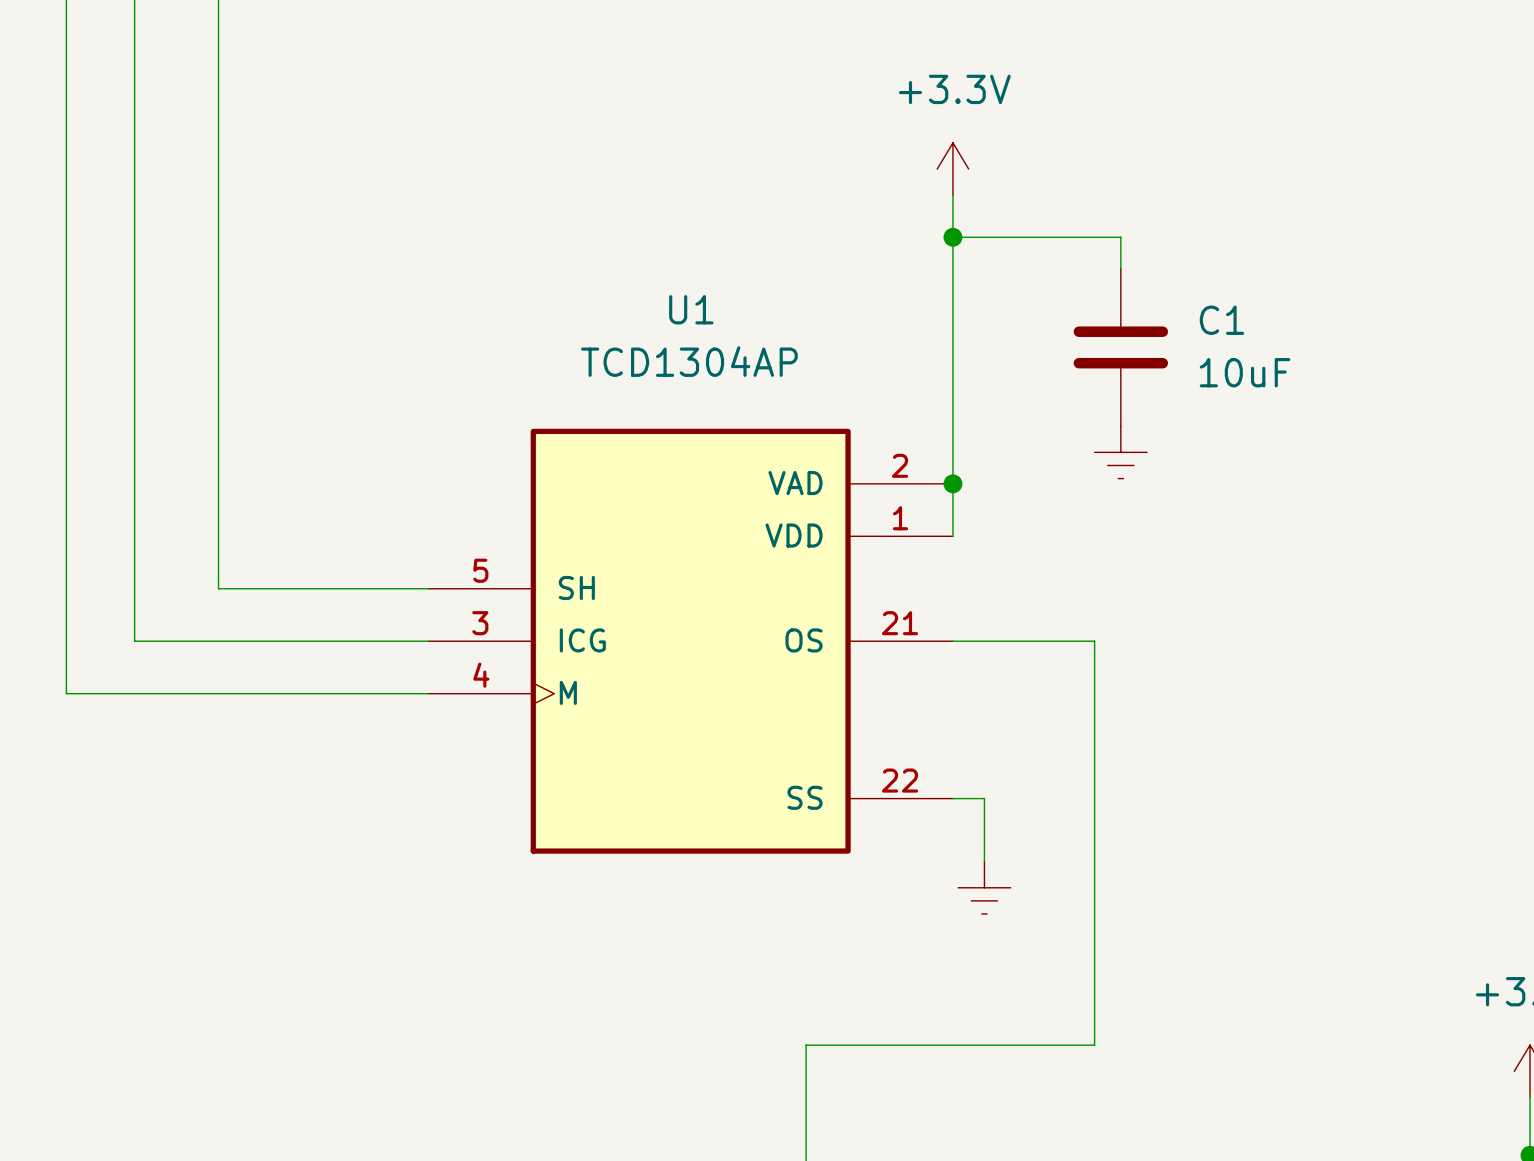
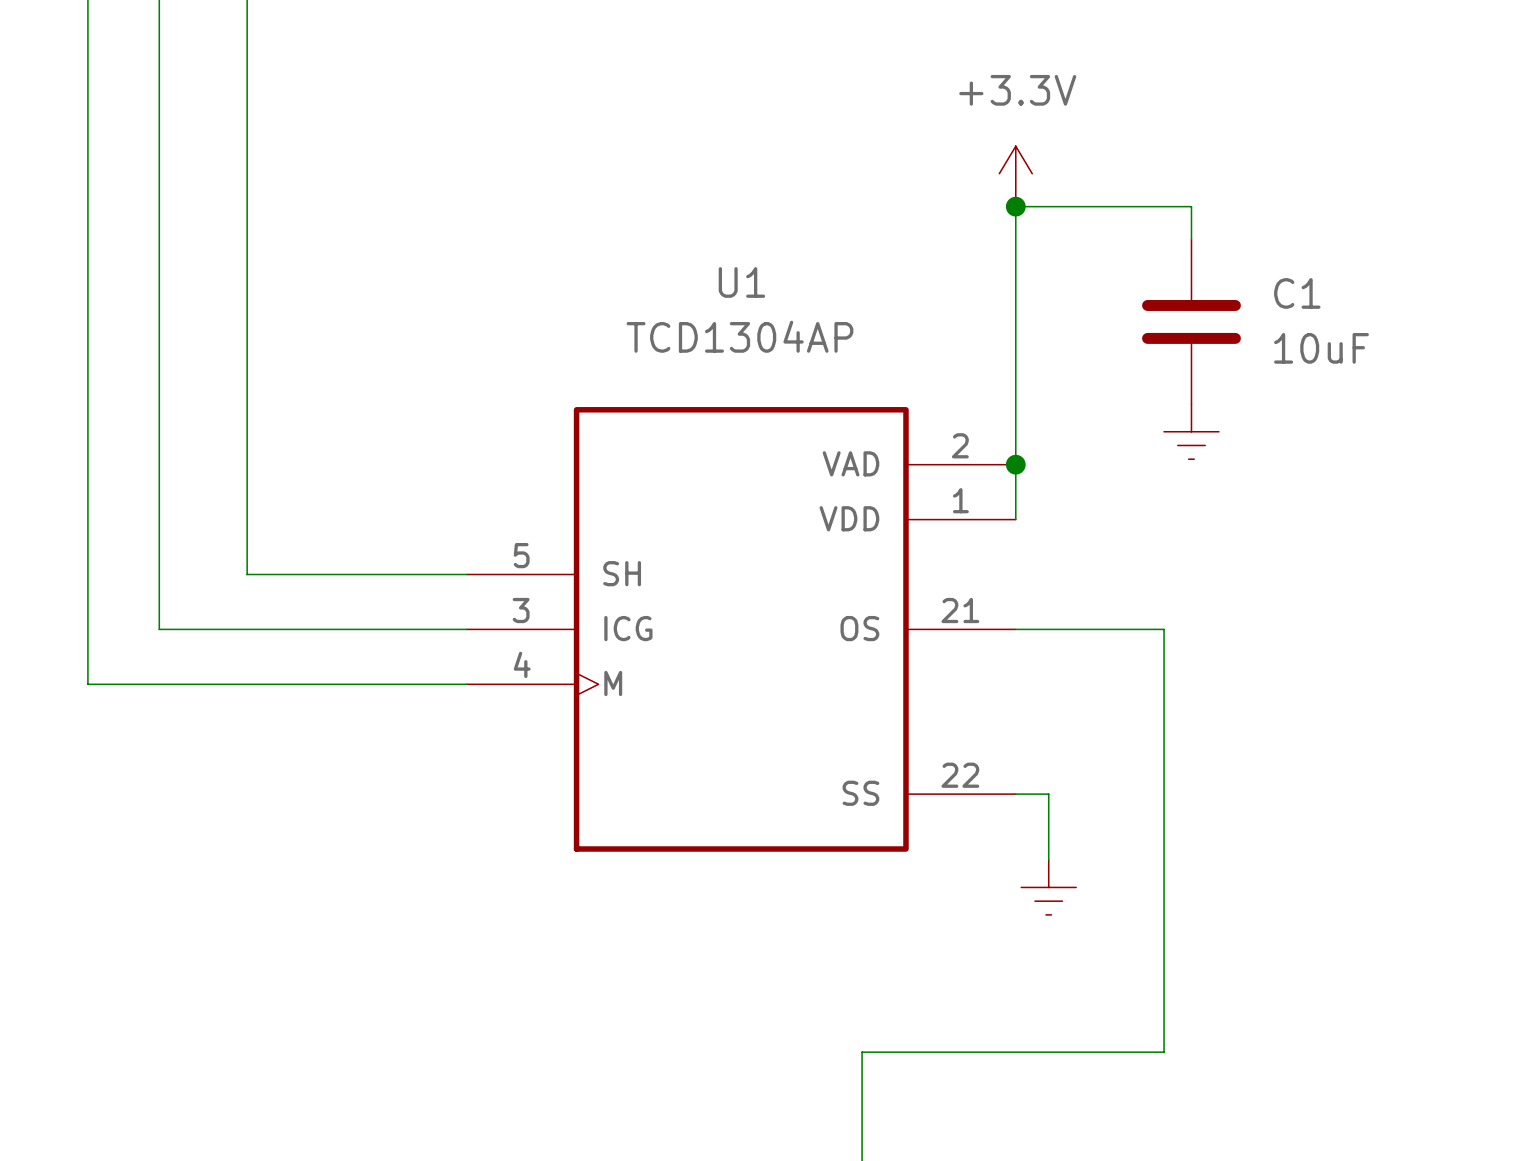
power symbol position: +3.3V (952, 169) -> +3.3V (1015, 173)

